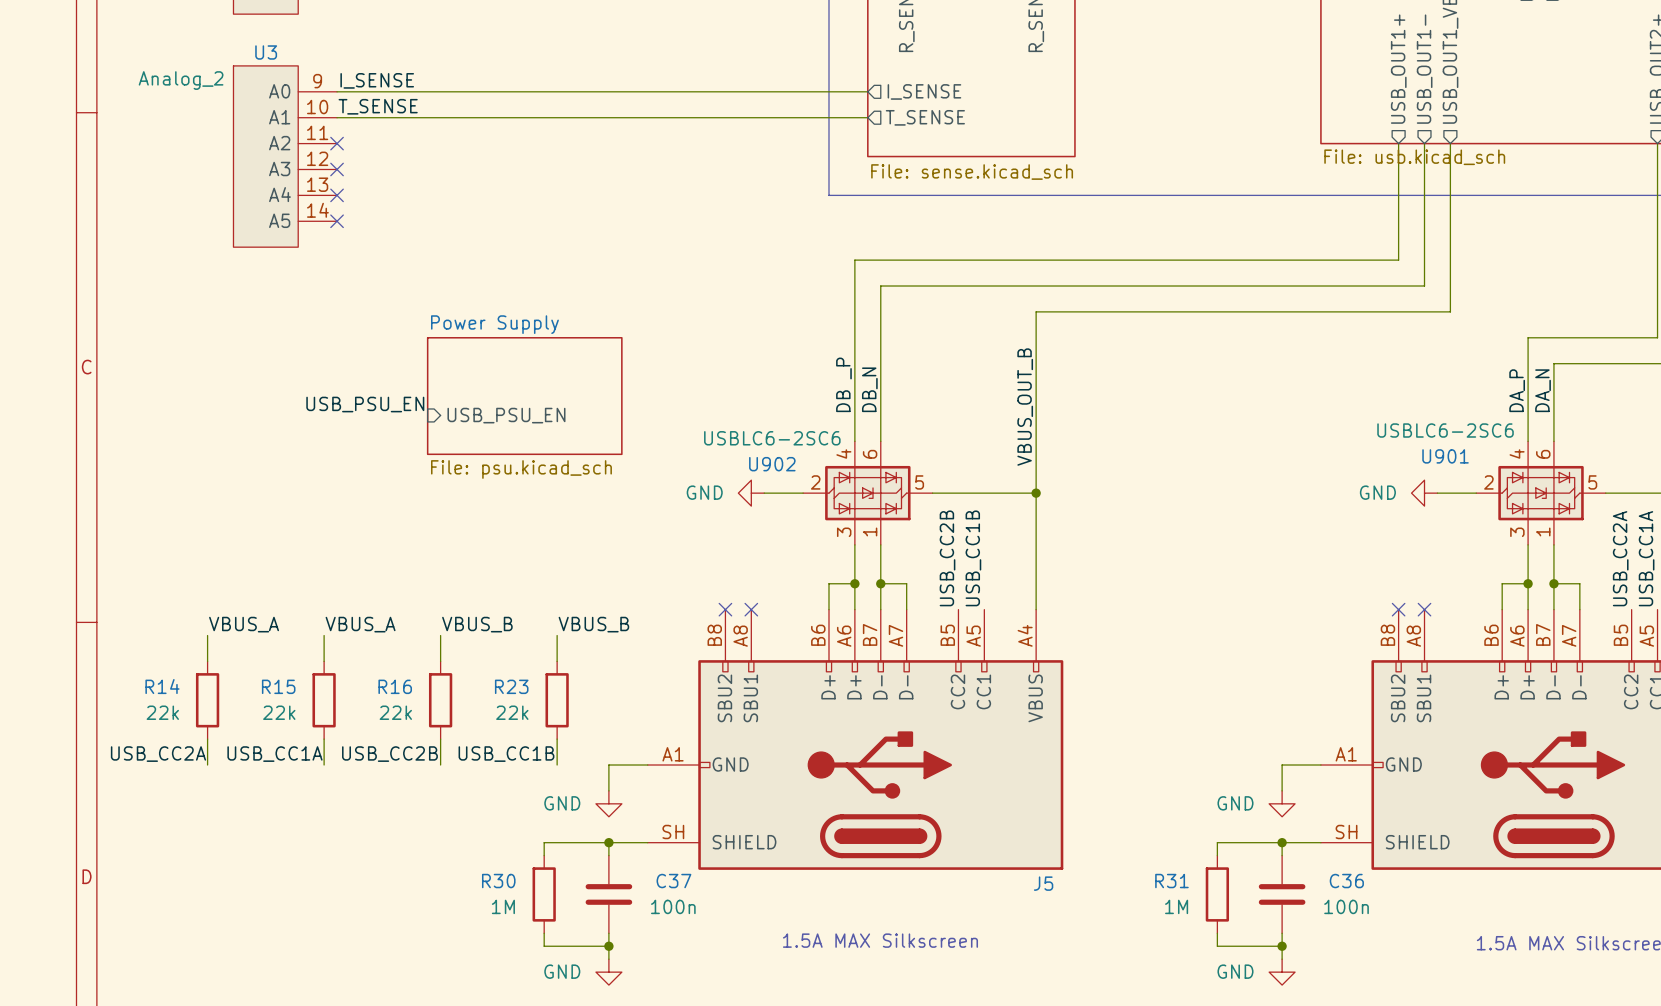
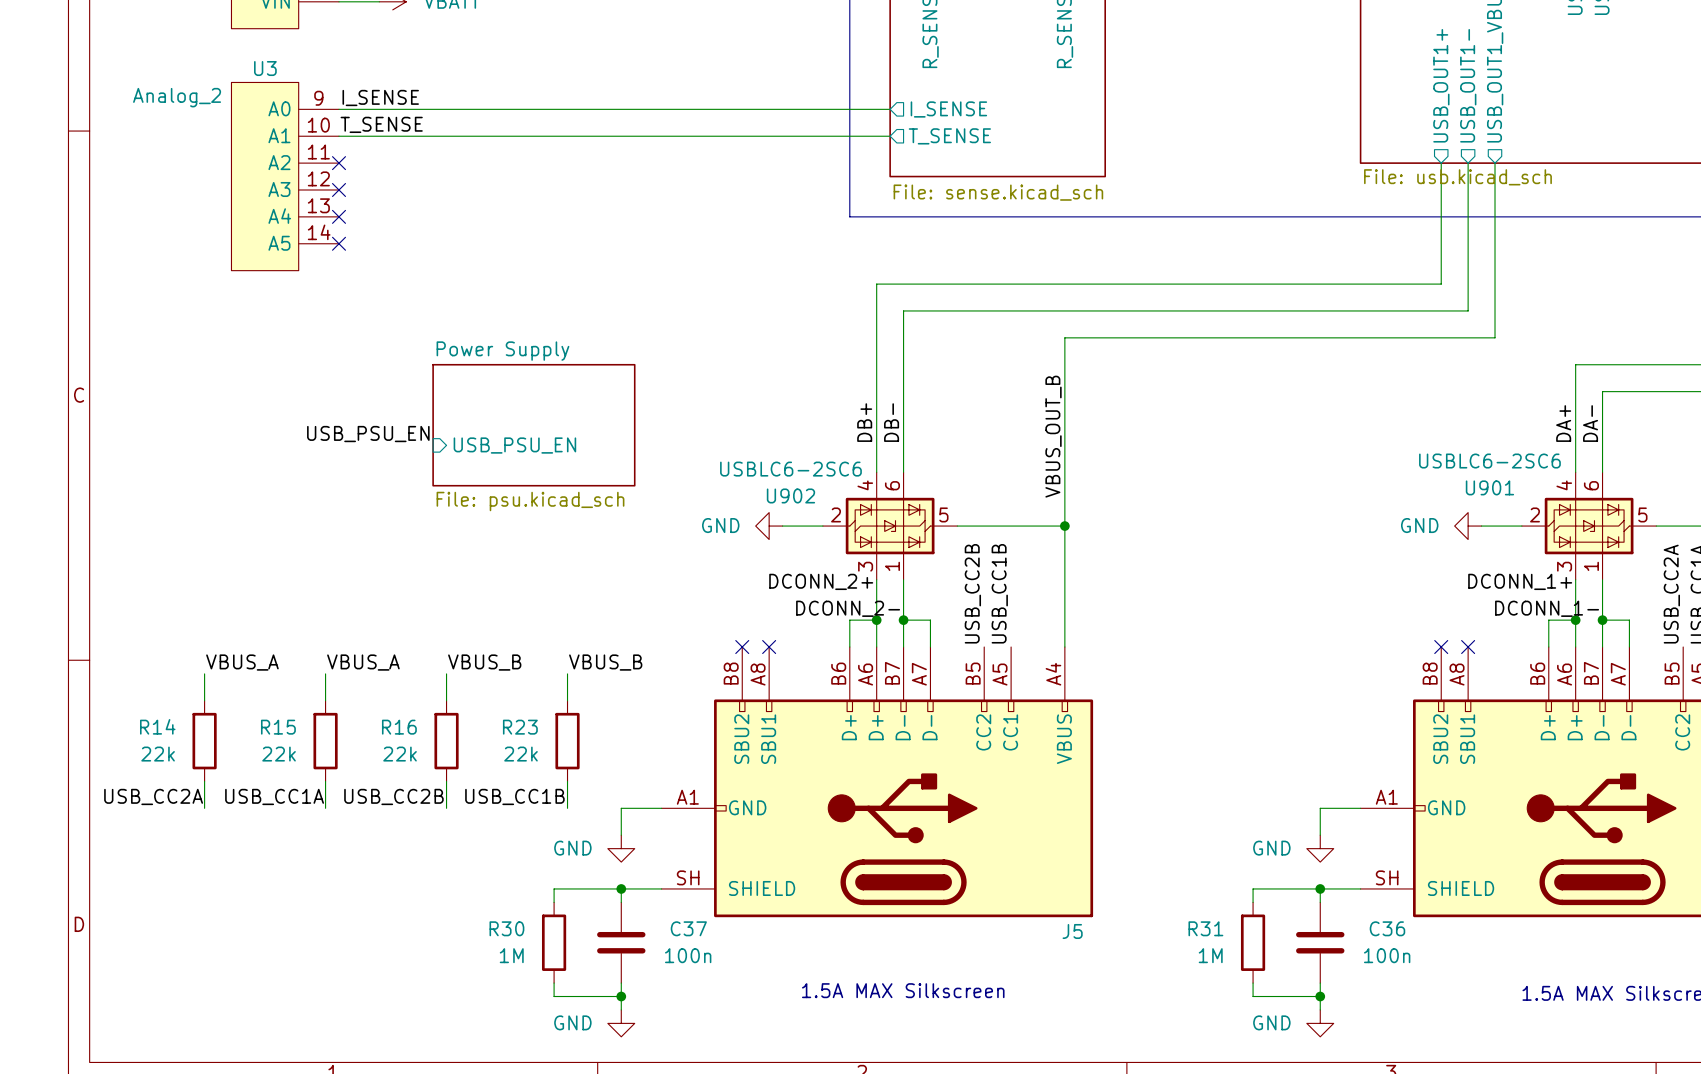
label: DB _P (843, 384) -> DB+ (864, 422)
label: DB_N (869, 389) -> DB- (891, 422)
label: DA_P (1517, 390) -> DA+ (1563, 423)
label: DA_N (1543, 390) -> DA- (1590, 423)
label: none -> DCONN_2+ (821, 581)
label: none -> DCONN_1+ (1520, 581)
label: none -> DCONN_2- (848, 608)
label: none -> DCONN_1- (1547, 608)

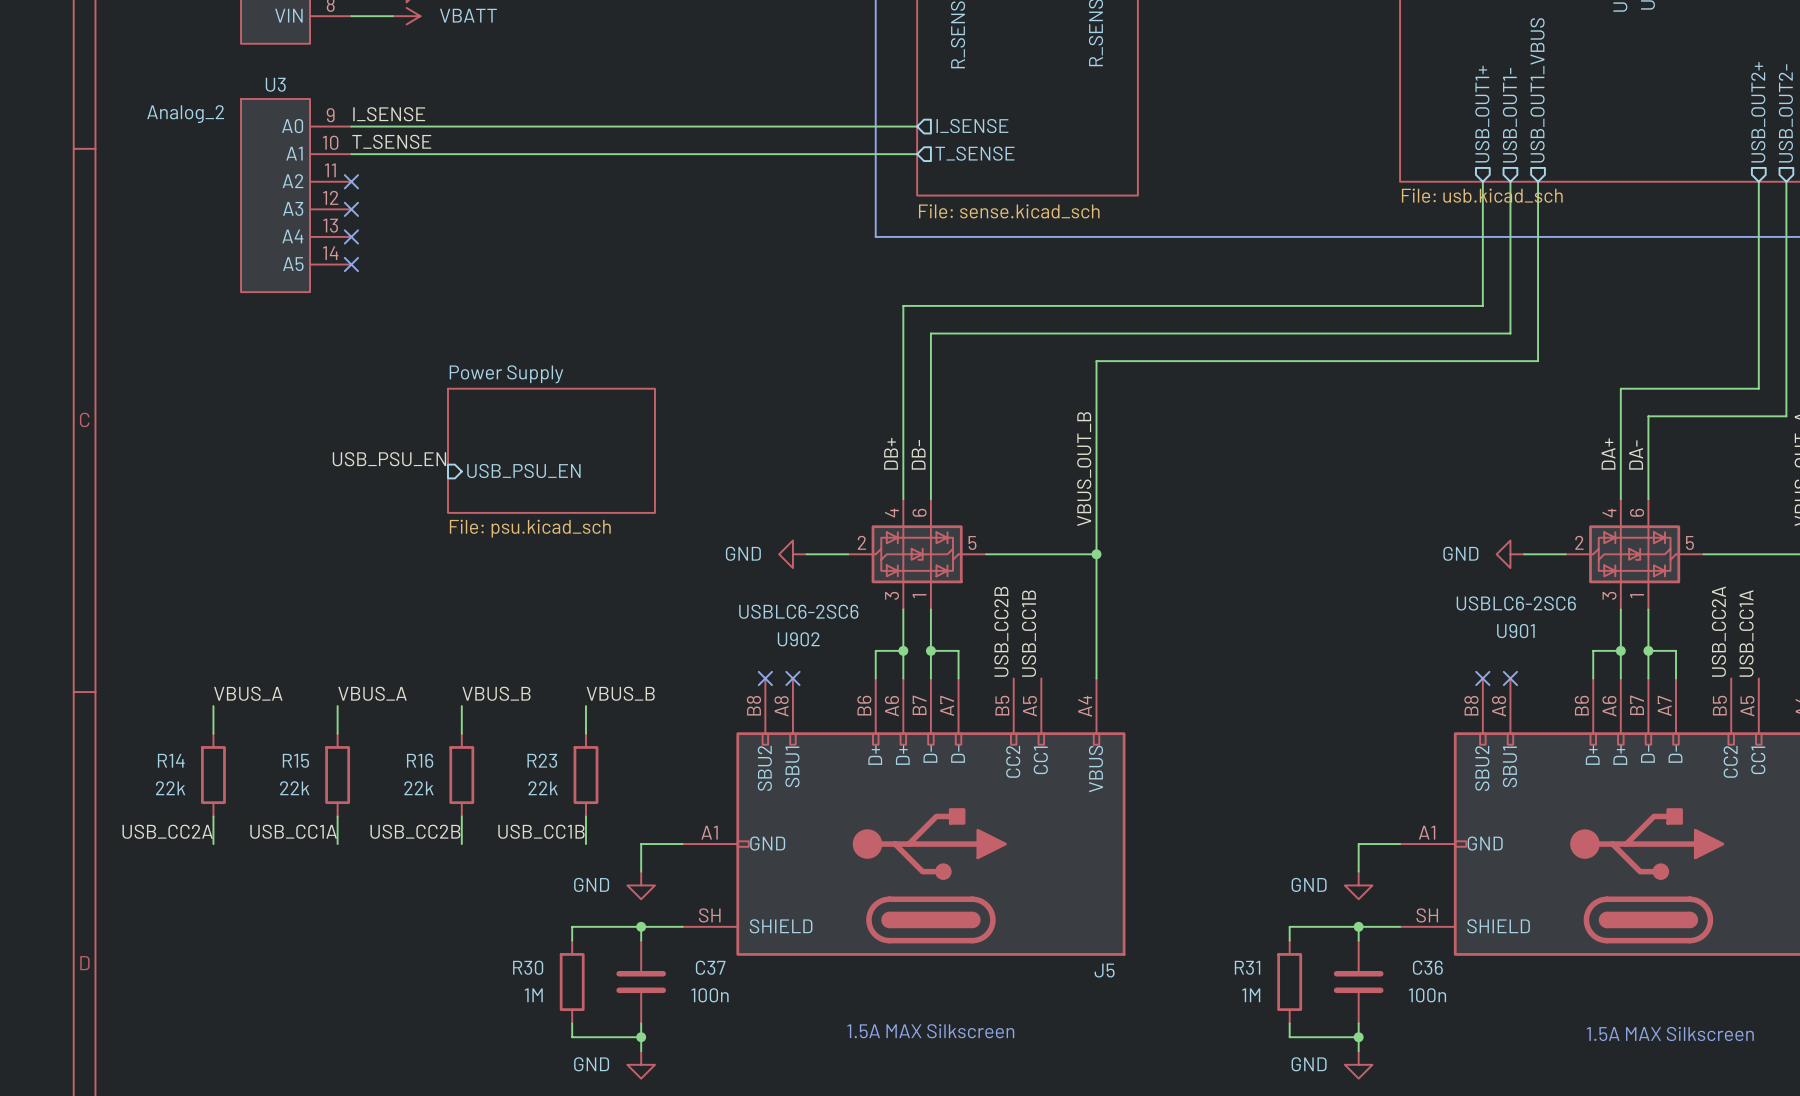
U901 value position: USBLC6-2SC6 (1489, 461) -> USBLC6-2SC6 (1516, 603)
U902 value position: USBLC6-2SC6 (790, 469) -> USBLC6-2SC6 (798, 611)
U901 name position: U901 (1489, 487) -> U901 (1515, 631)
U902 name position: U902 (790, 495) -> U902 (798, 639)
label: DCONN_2+ (821, 581) -> none
label: DCONN_1+ (1520, 581) -> none
label: DCONN_2- (848, 608) -> none
label: DCONN_1- (1547, 608) -> none

